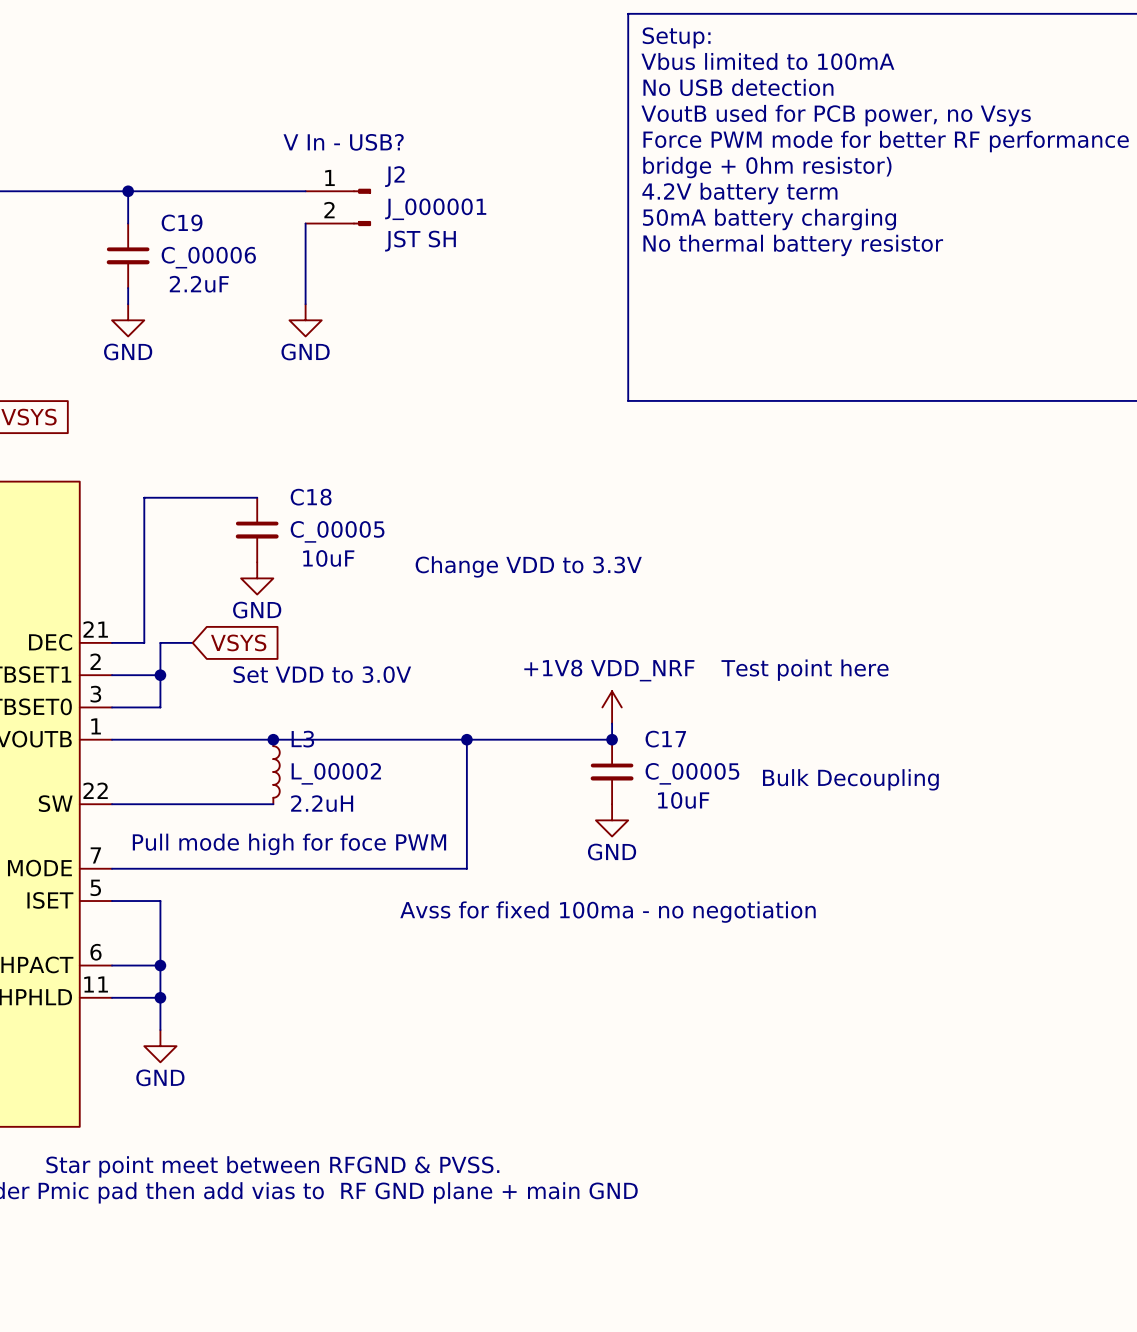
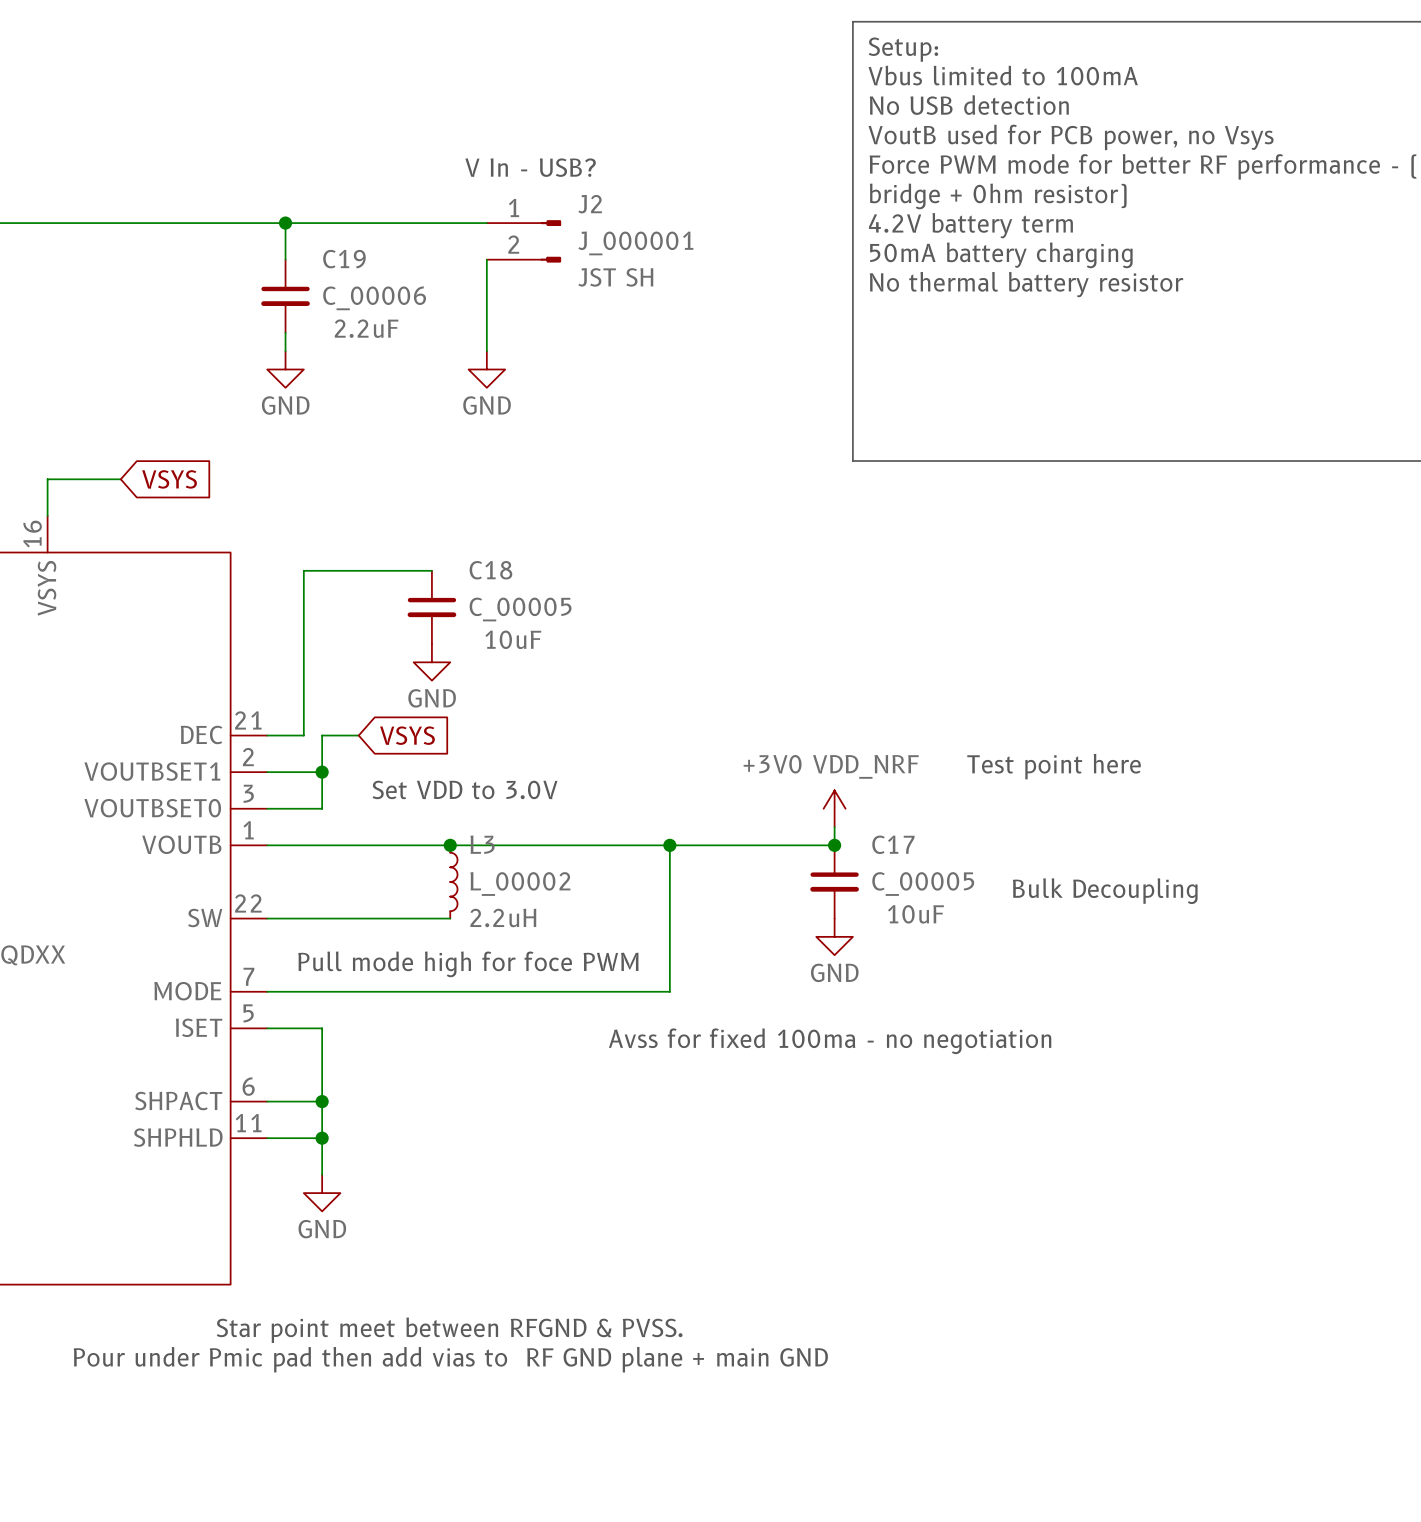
text: Change VDD to 3.3V (528, 566) -> none
text position: Set VDD to 3.0V (322, 674) -> Set VDD to 3.0V (465, 789)
power symbol: +1V8 VDD_NRF (612, 707) -> +3V0 VDD_NRF (834, 808)

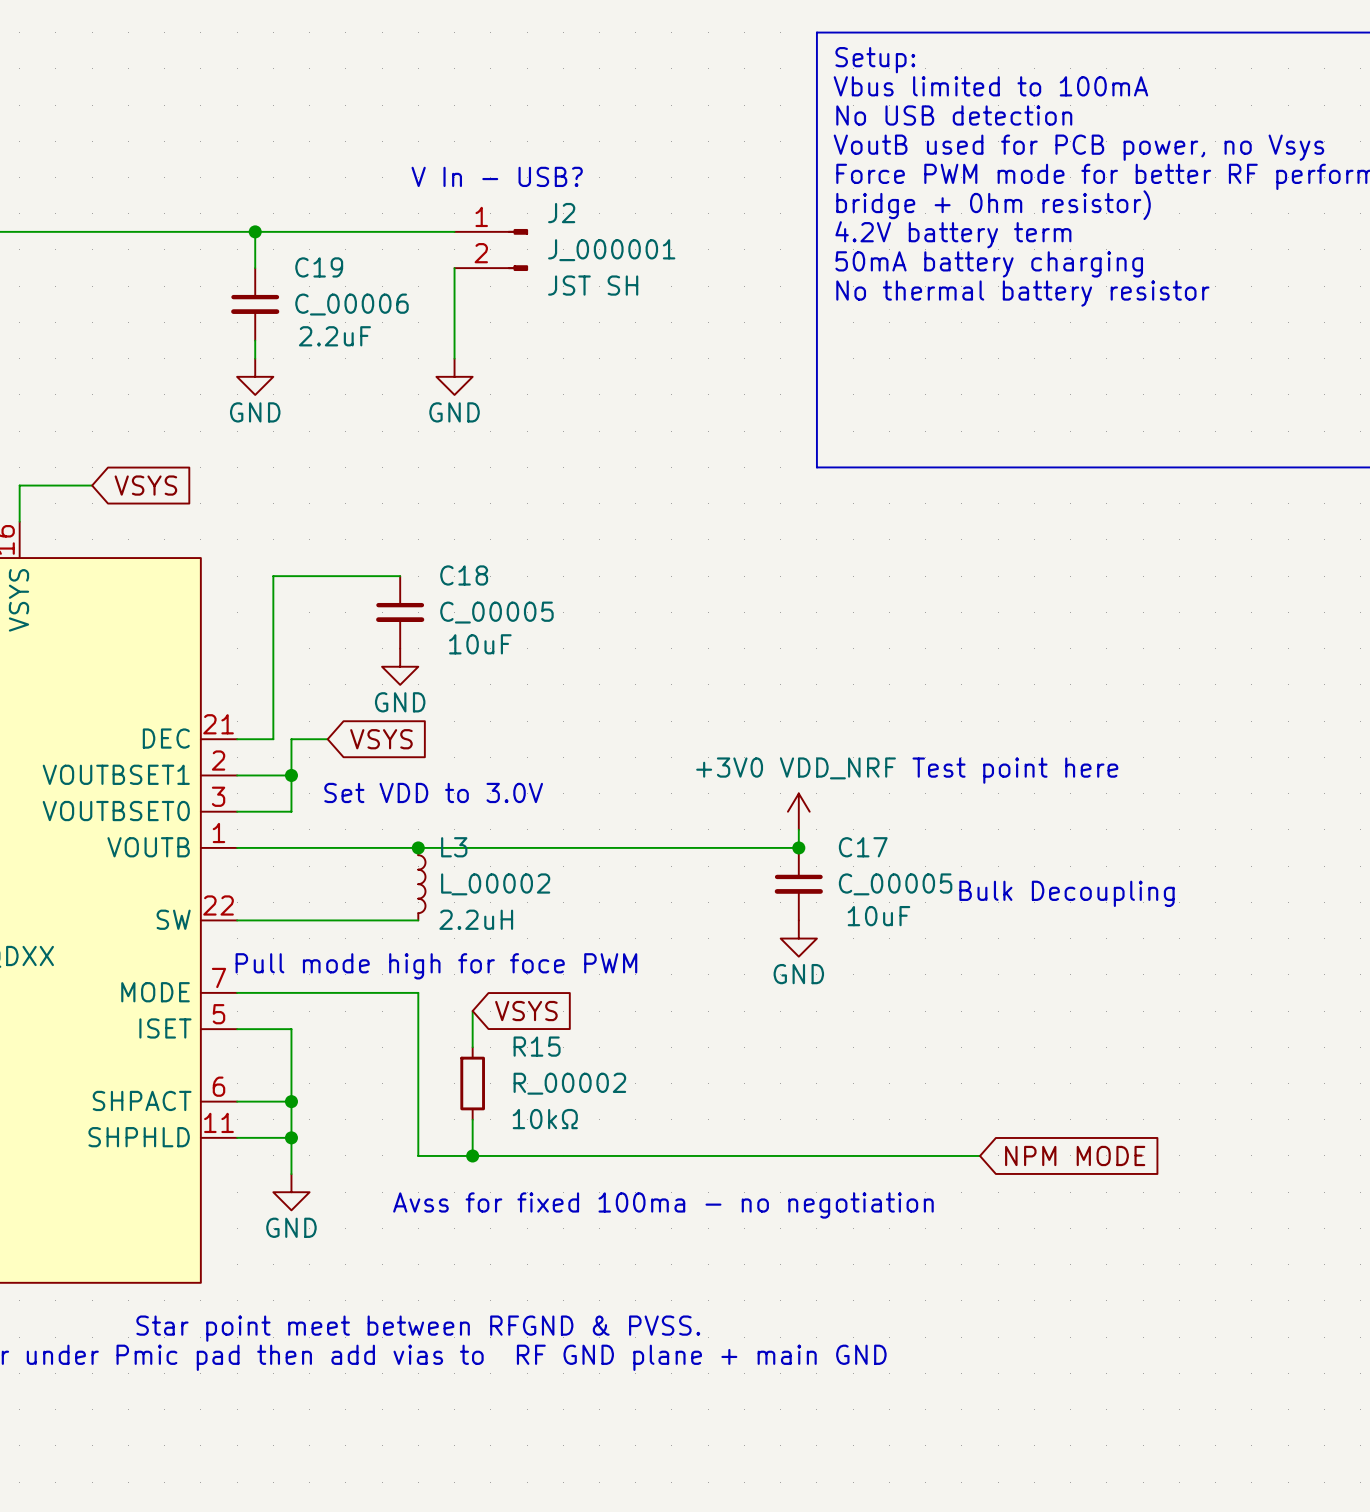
wire: (669, 845) (669, 991) (450, 991) -> (980, 1155) (418, 1155) (418, 992)
junction: (669, 845) -> none
wire: none -> (472, 1011) (472, 1047)
global label: none -> VSYS (526, 1011)
text position: Avss for fixed 100ma - no negotiation (830, 1041) -> Avss for fixed 100ma - no negotiation (663, 1205)
R15: none -> R_00002 (472, 1083)
wire: none -> (472, 1119) (472, 1155)
junction: none -> (472, 1155)
global label: none -> NPM MODE (1075, 1155)

